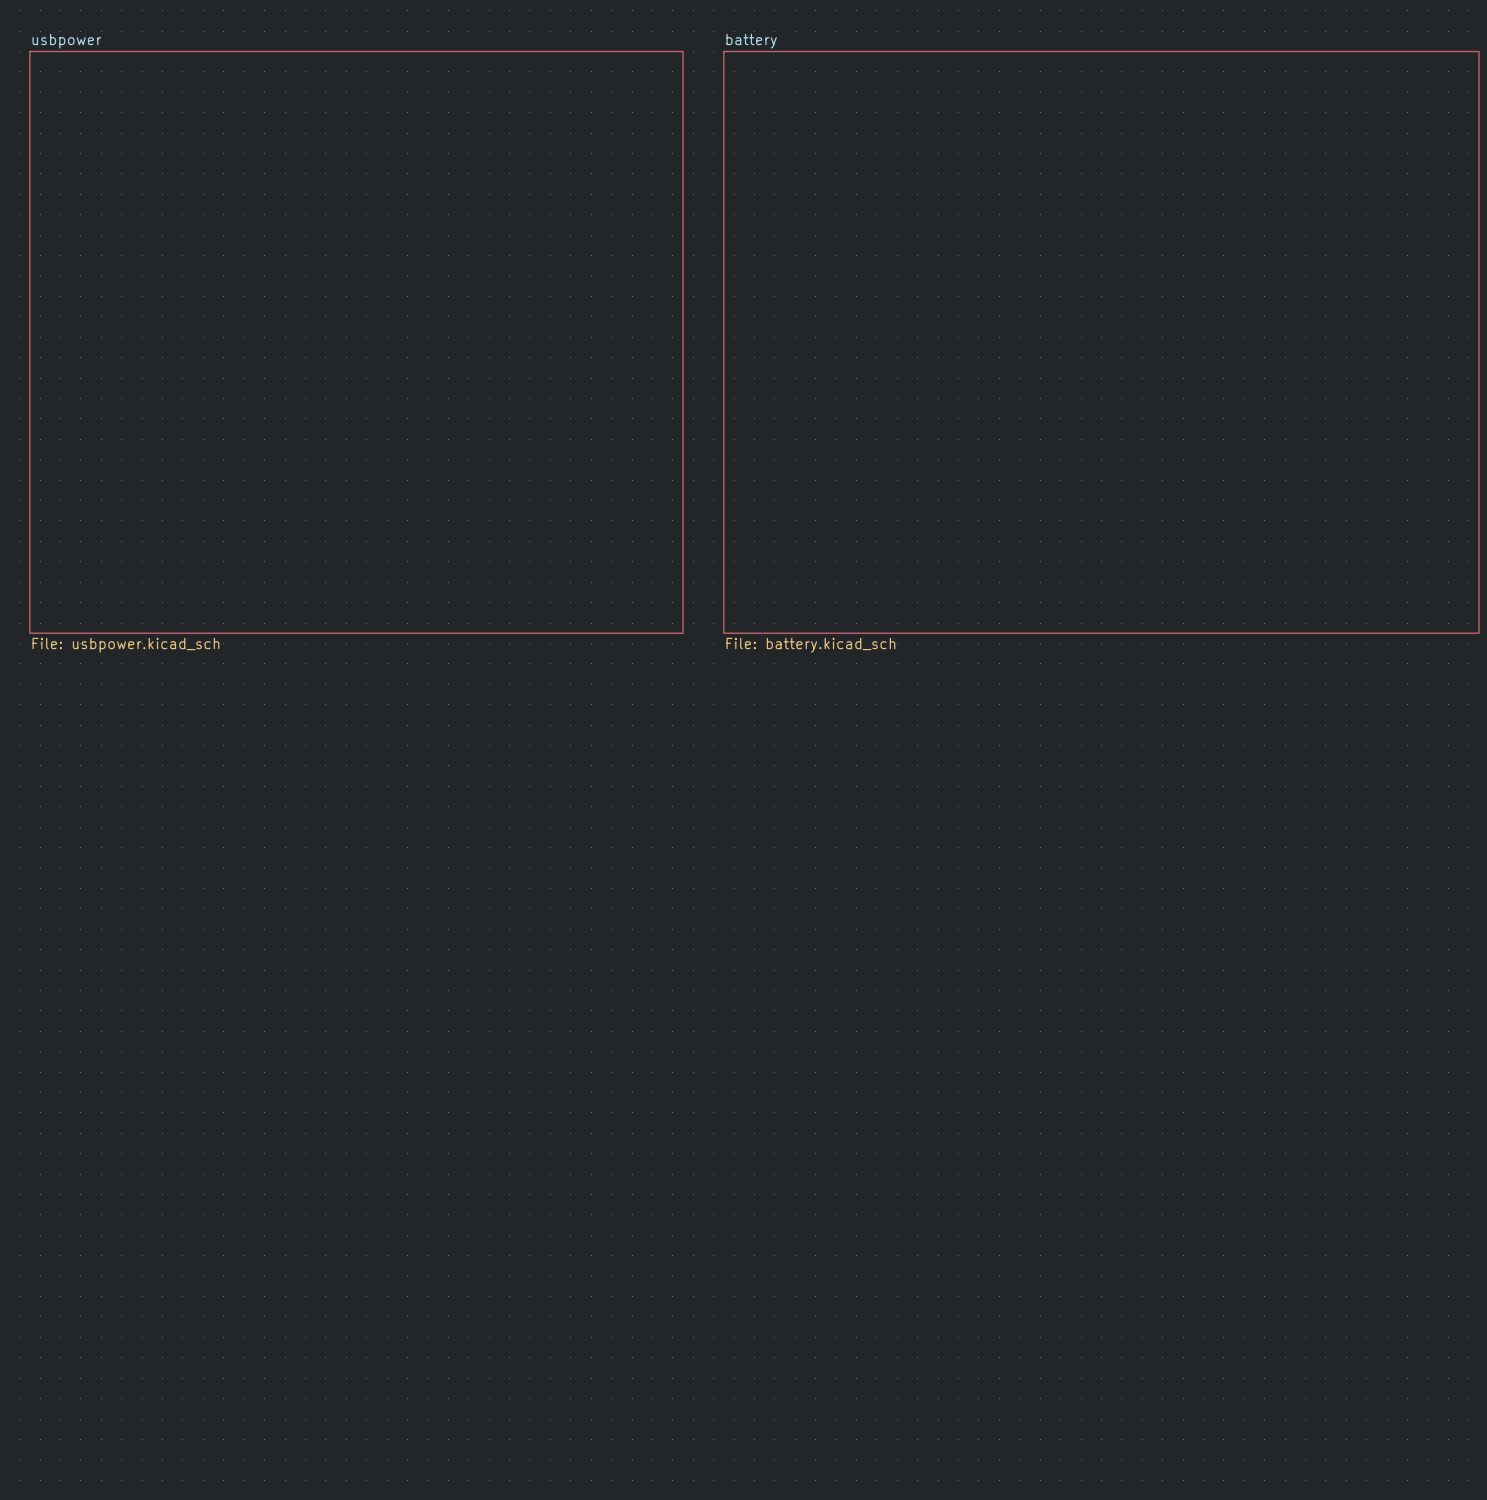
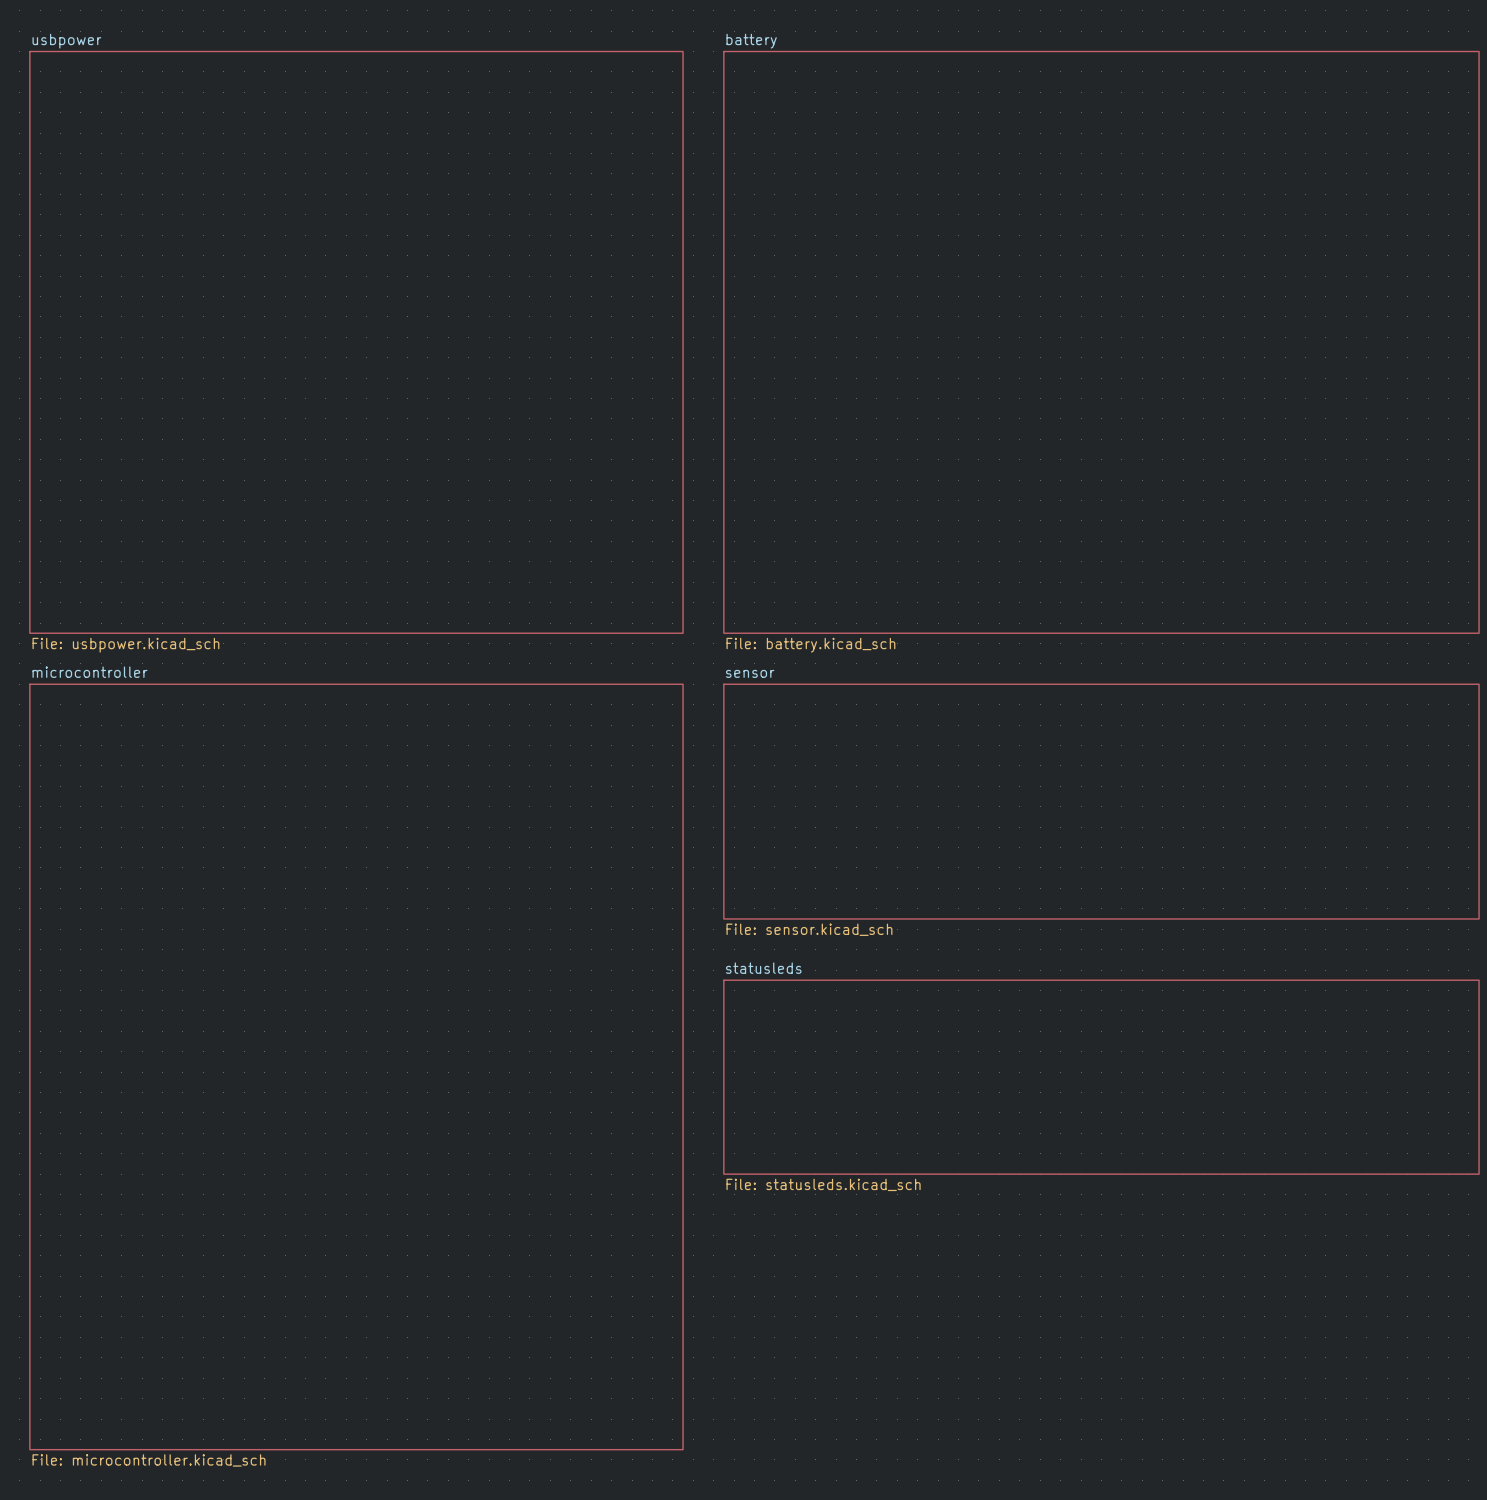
sheet sensor: none -> File: sensor.kicad_sch (1101, 801)
sheet microcontroller: none -> File: microcontroller.kicad_sch (356, 1066)
sheet statusleds: none -> File: statusleds.kicad_sch (1101, 1077)

